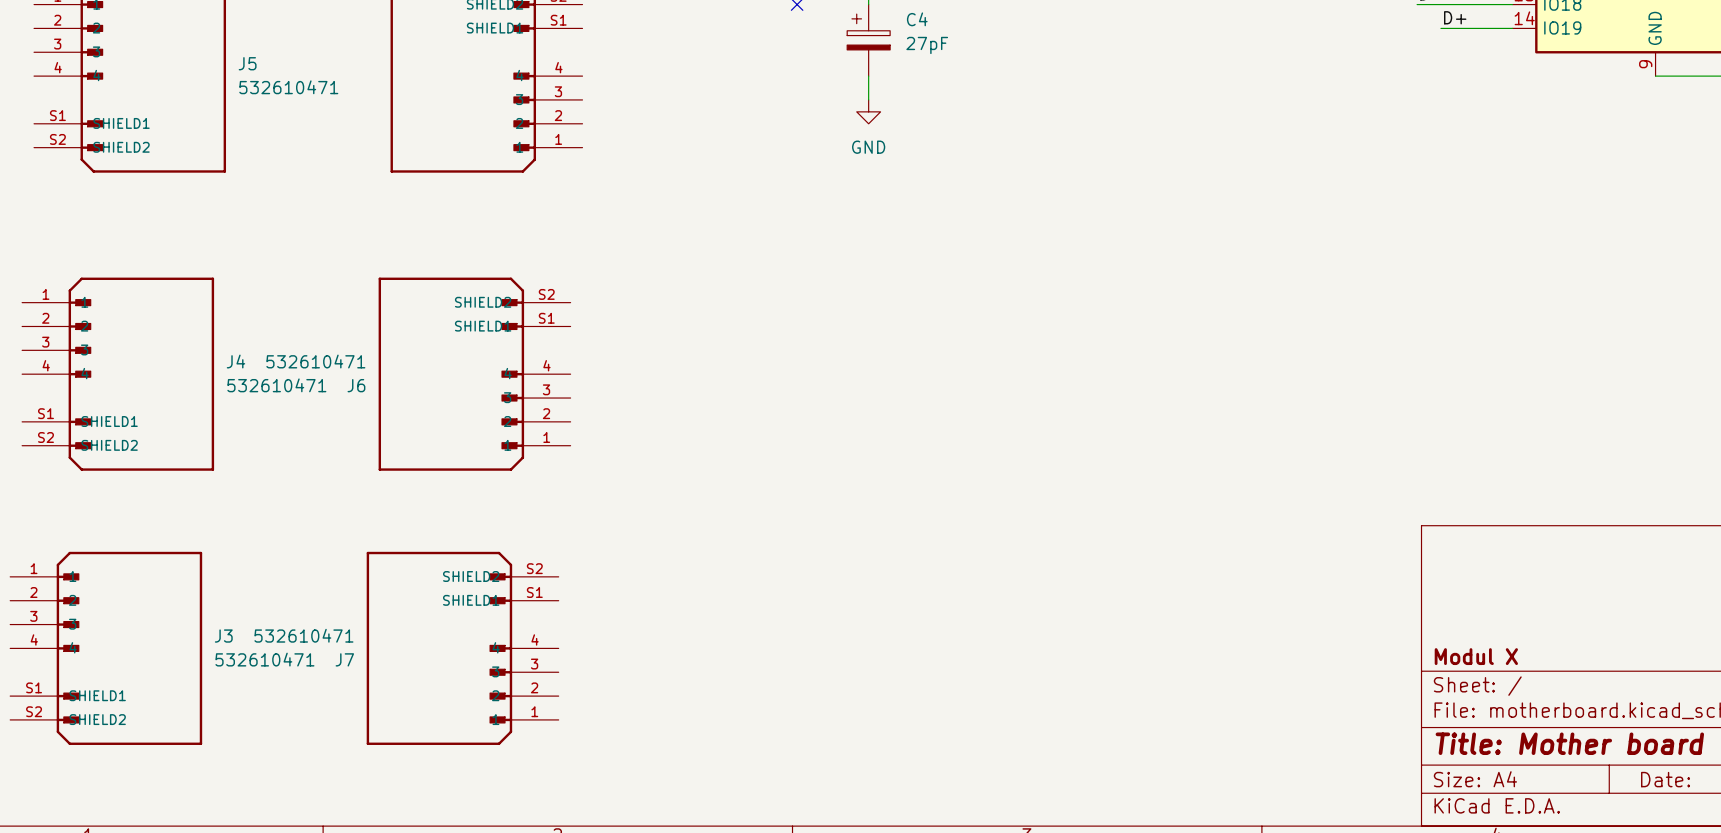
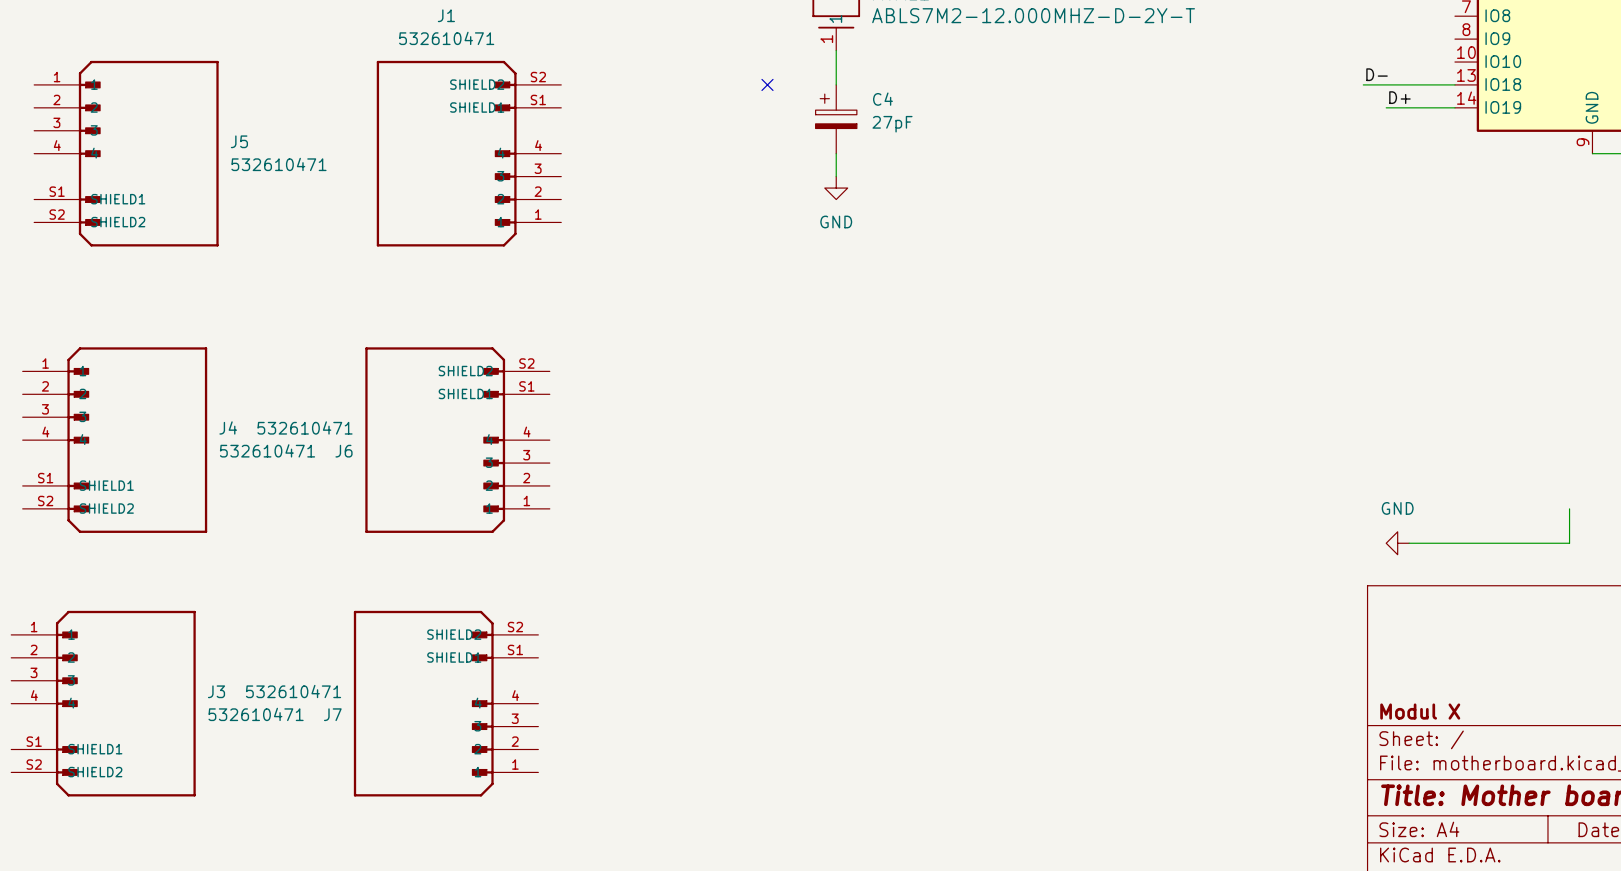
wire: none -> (1569, 508) (1569, 543) (1409, 543)
power symbol: none -> GND (1397, 543)

